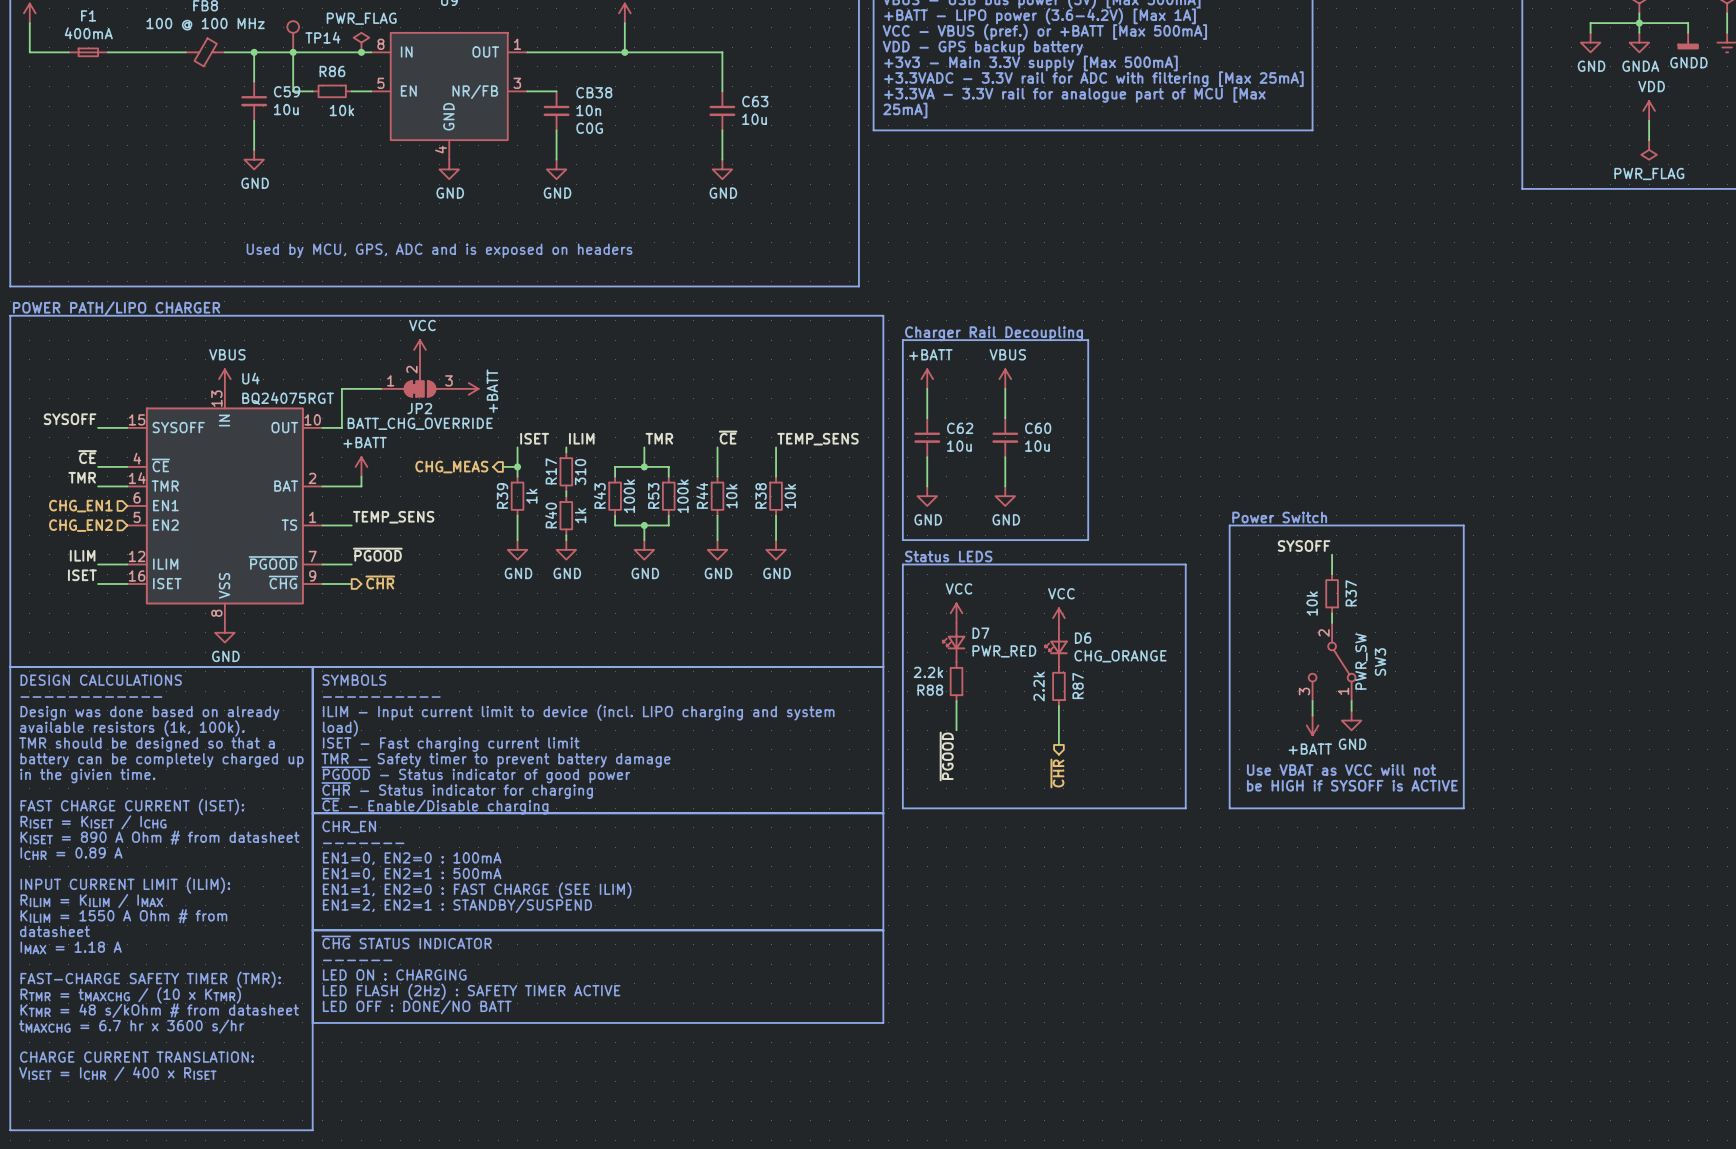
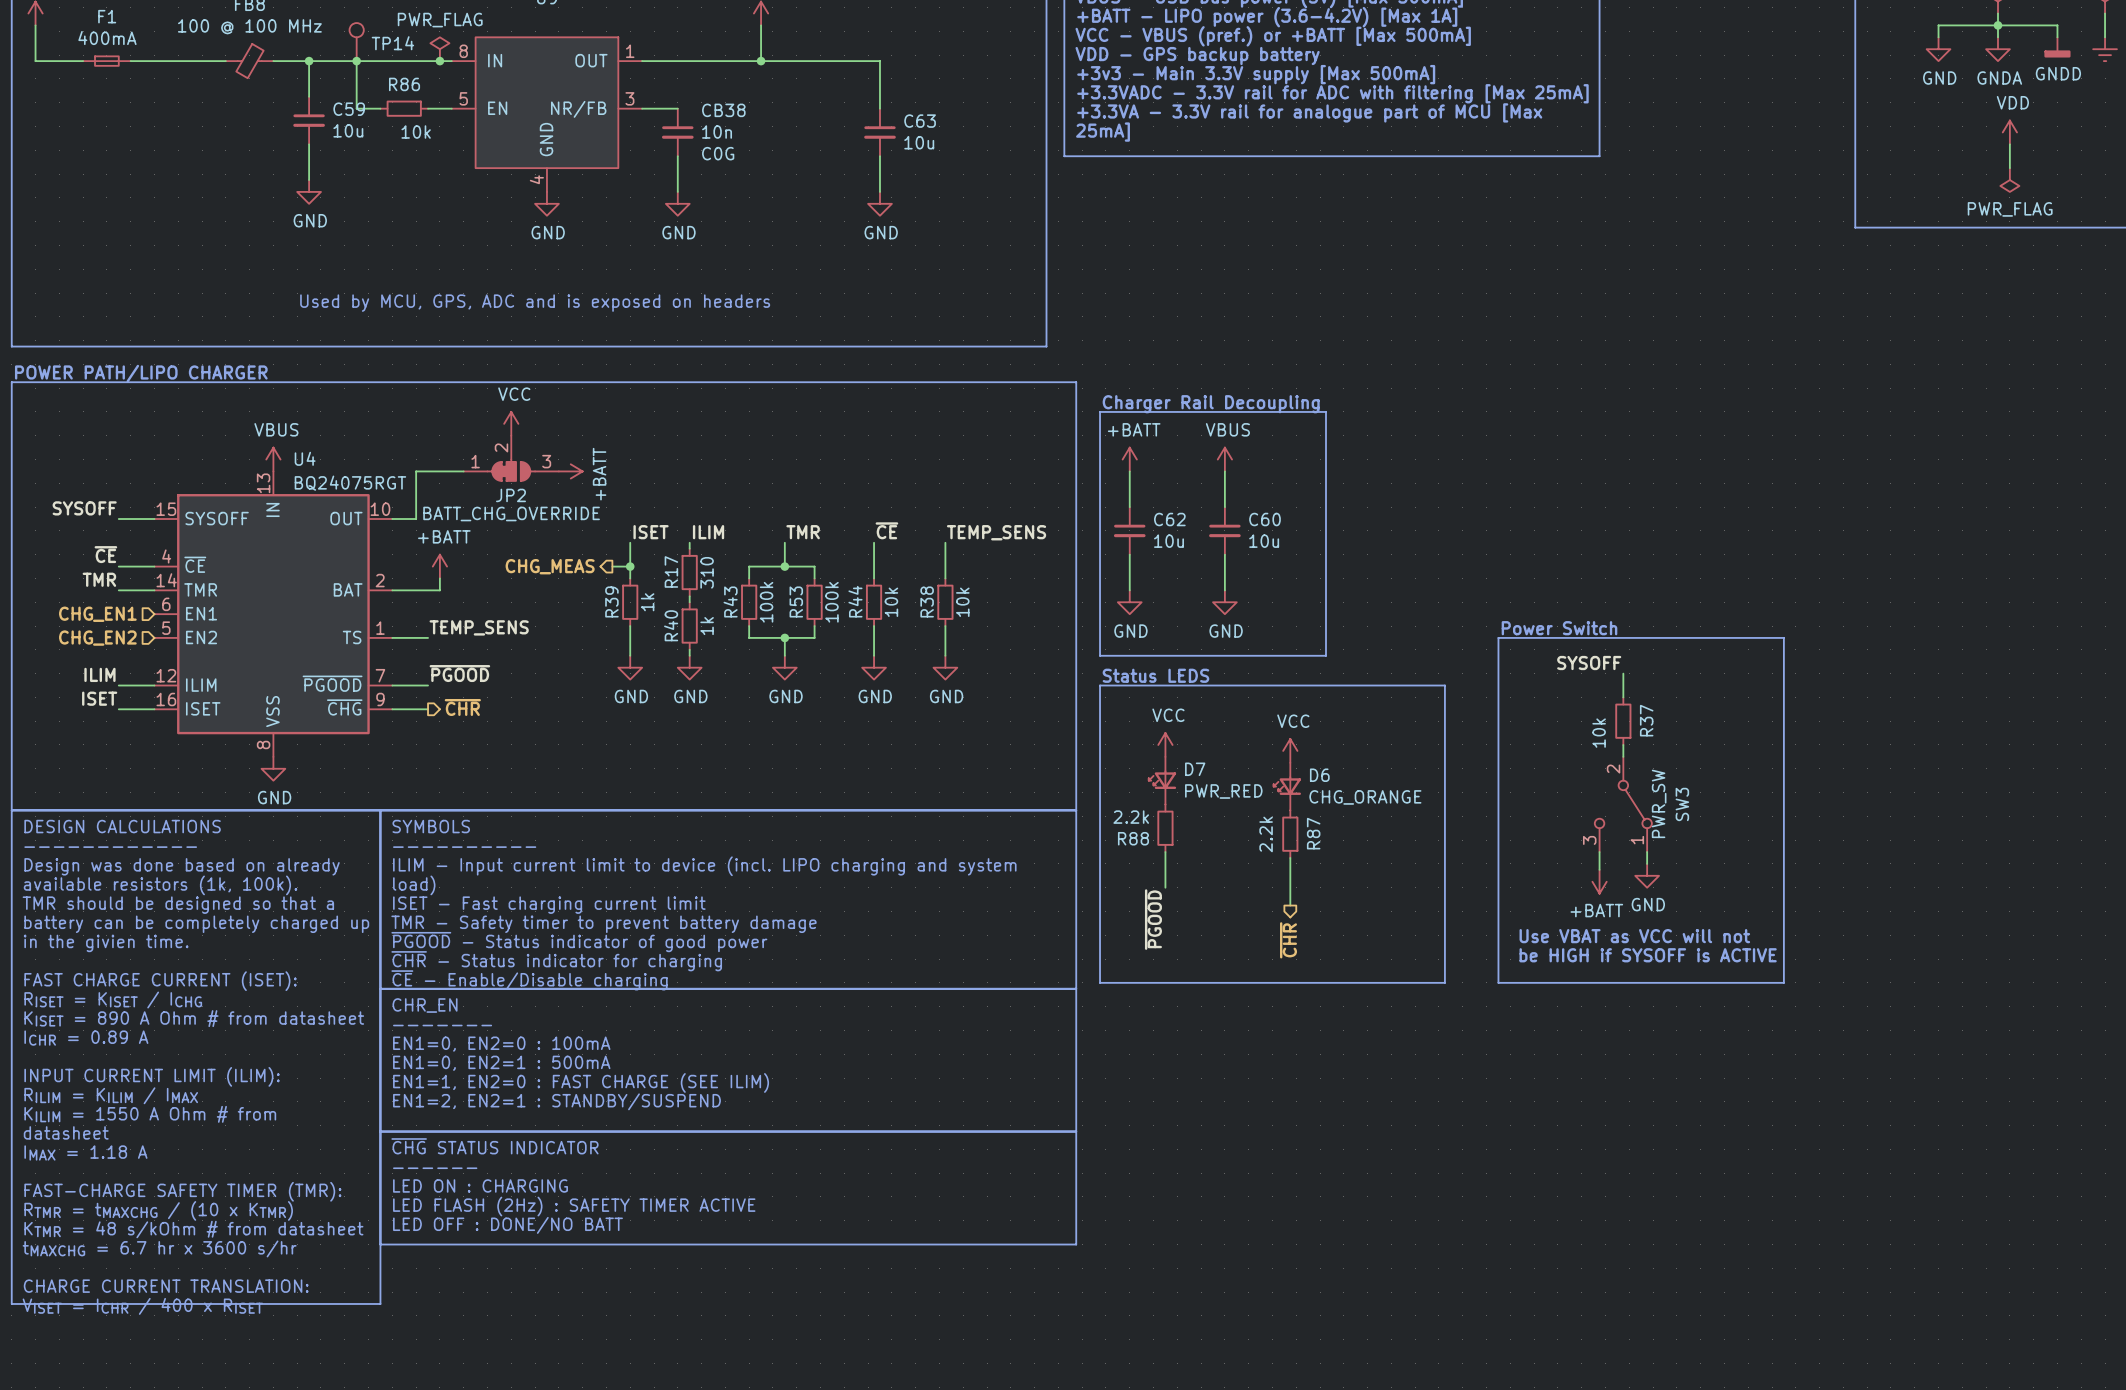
line: (10, 1071) (10, 1130) (312, 1130) (312, 1071) -> (11, 1303) (380, 1303)

